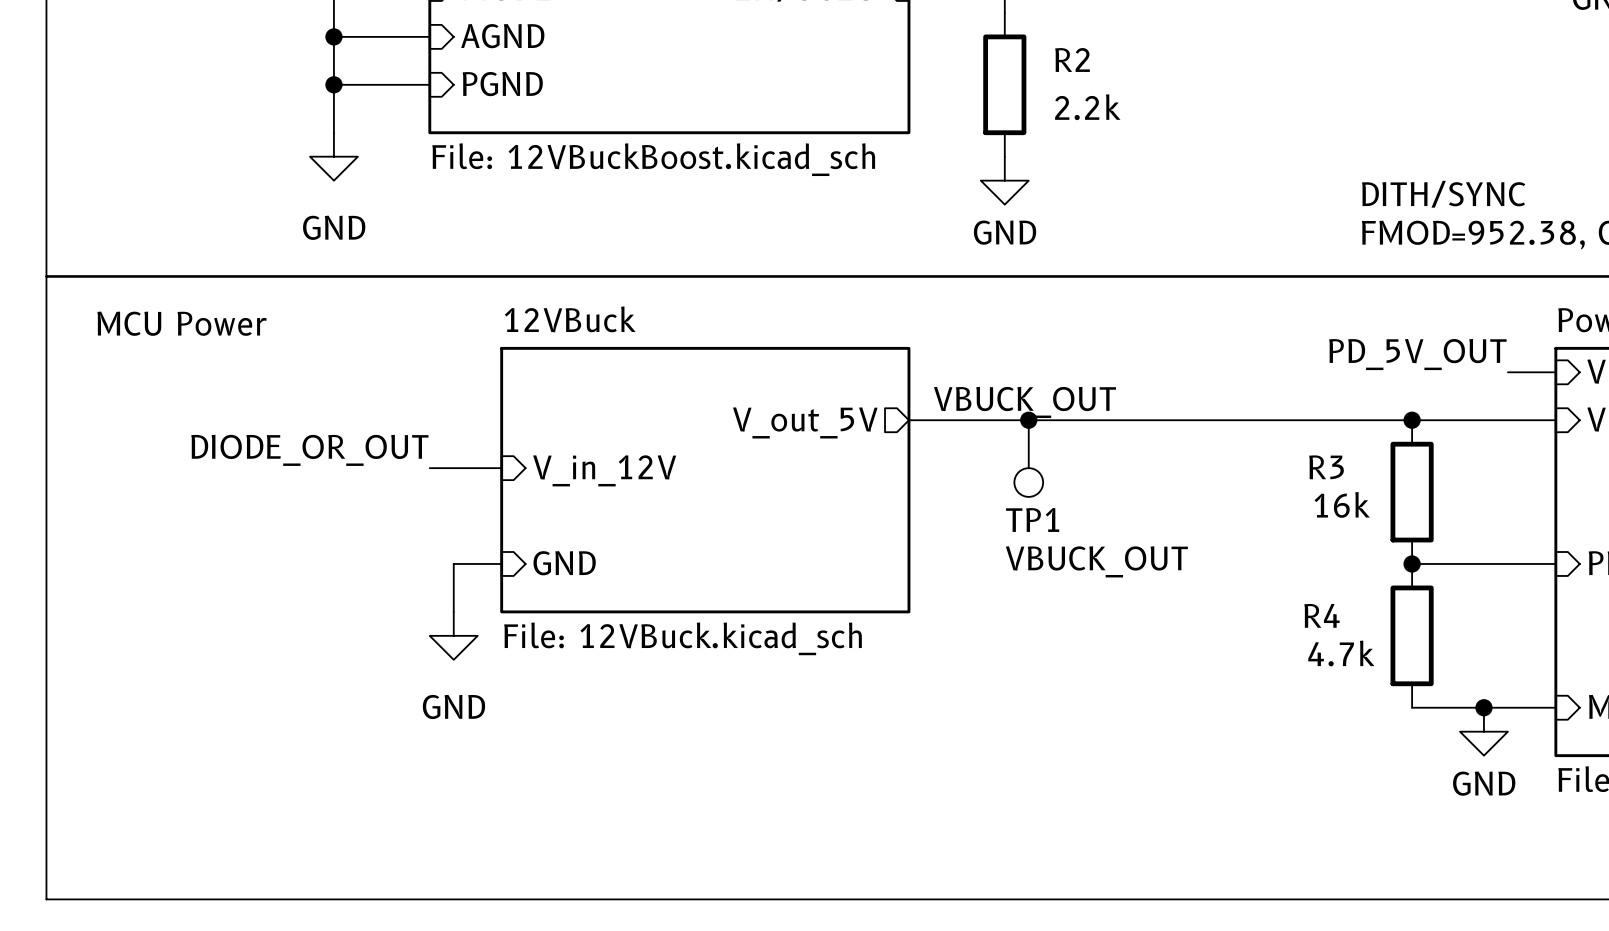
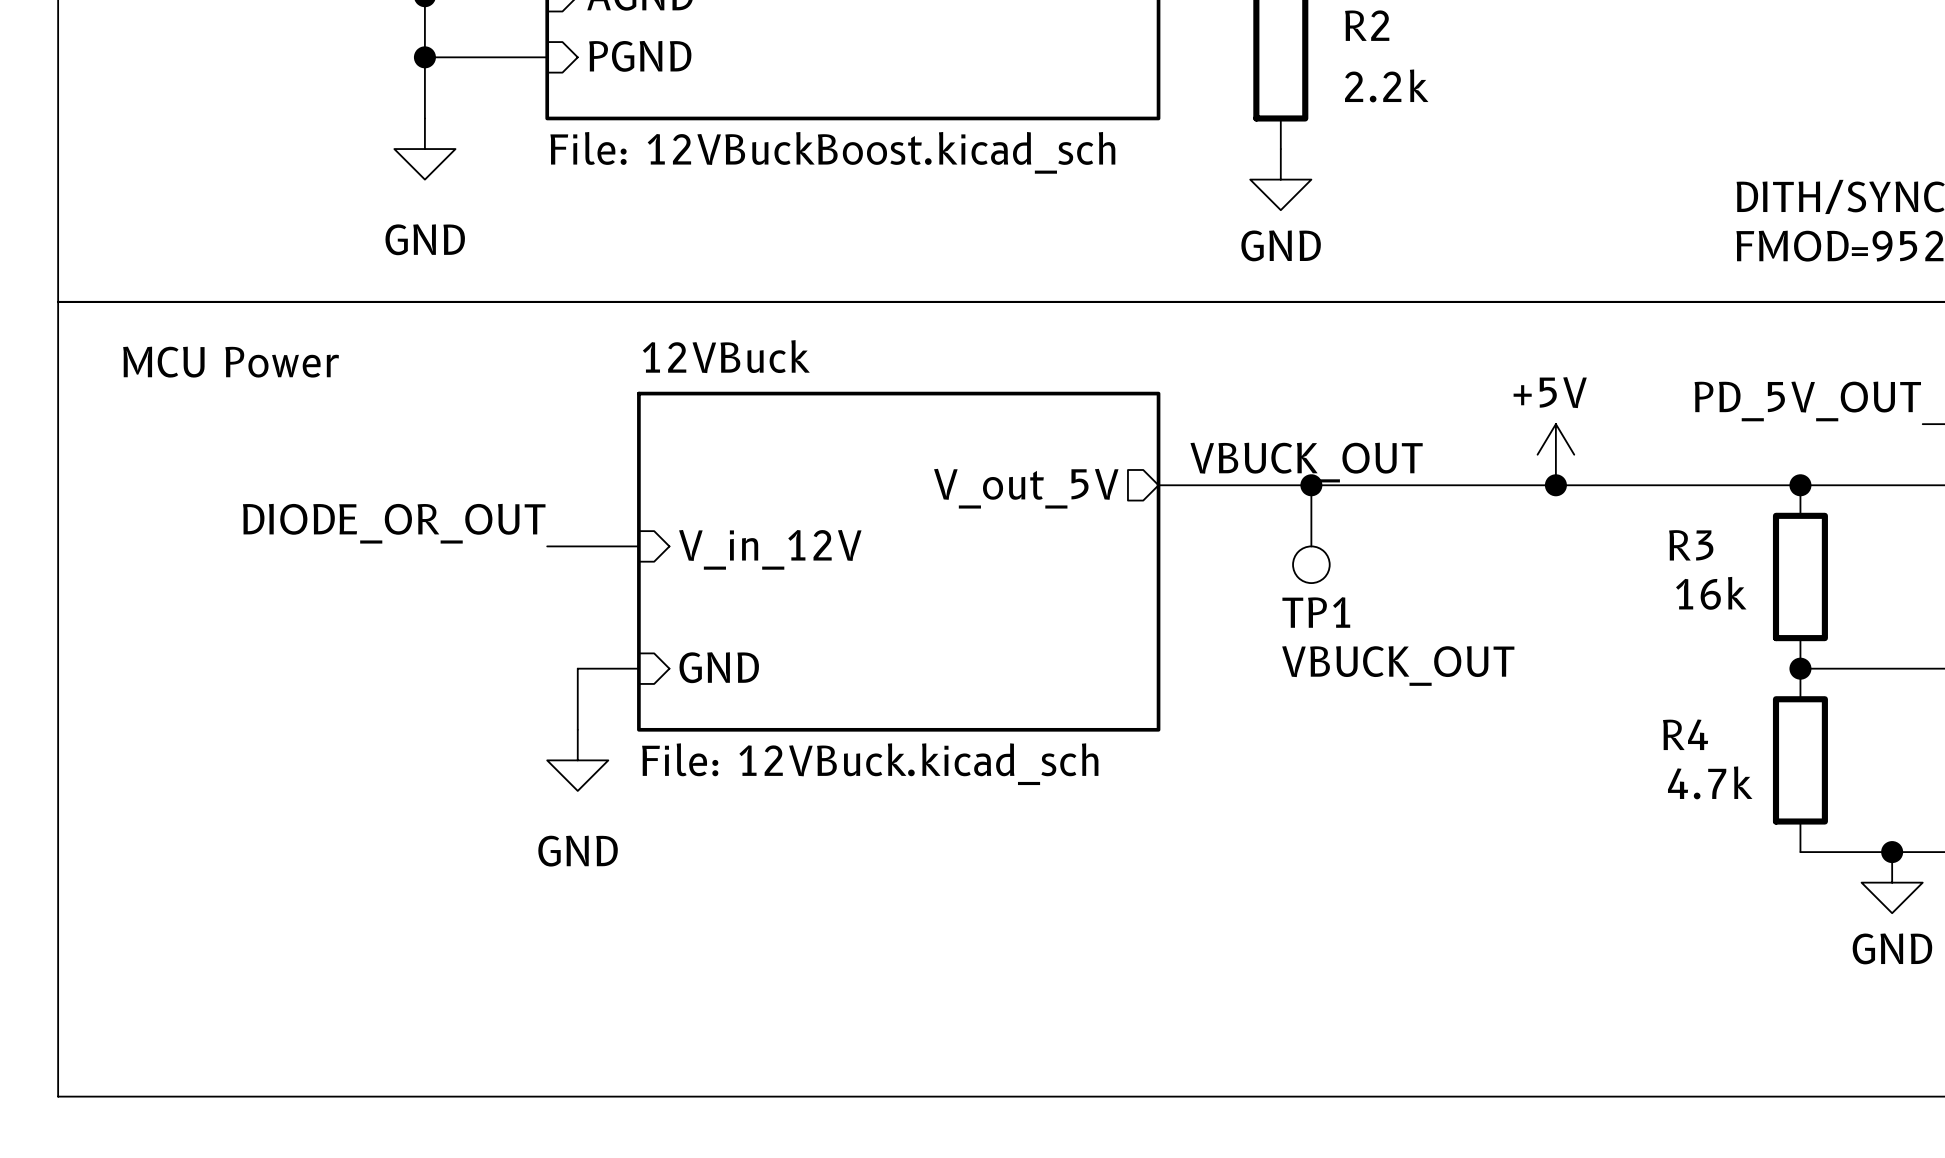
power symbol: none -> +5V (1555, 454)
junction: none -> (1555, 485)

